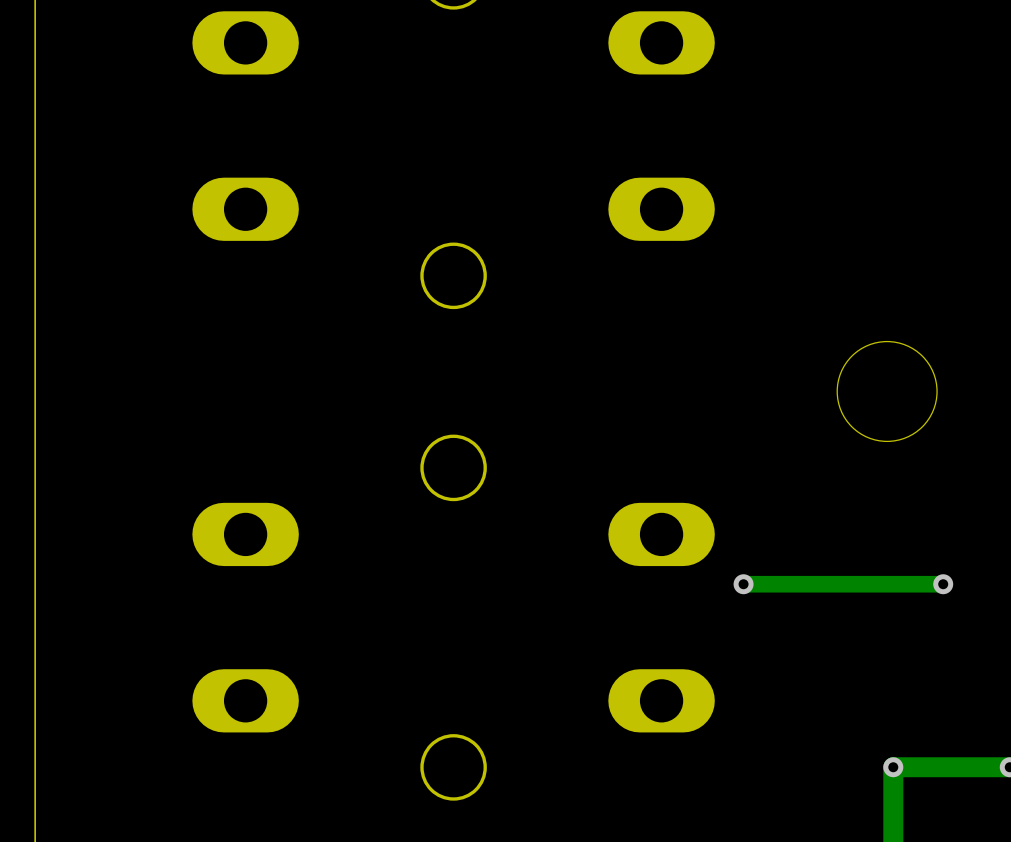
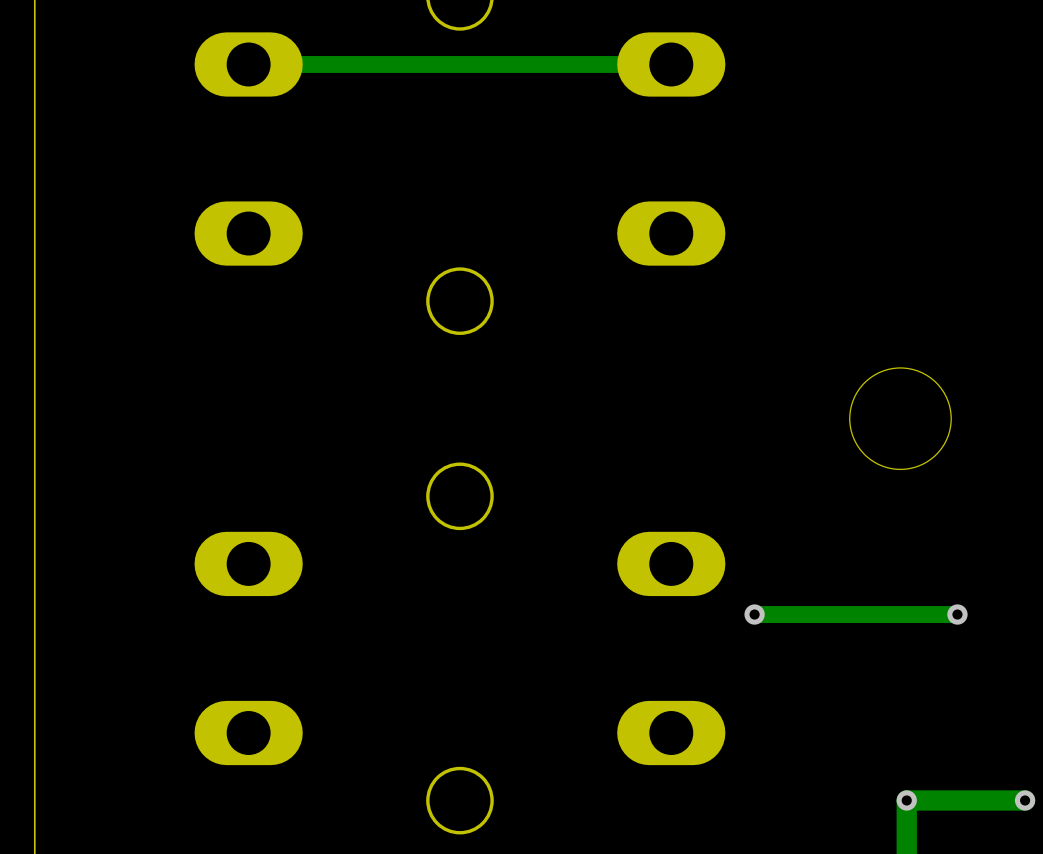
track: none -> (671, 64) (248, 64)

